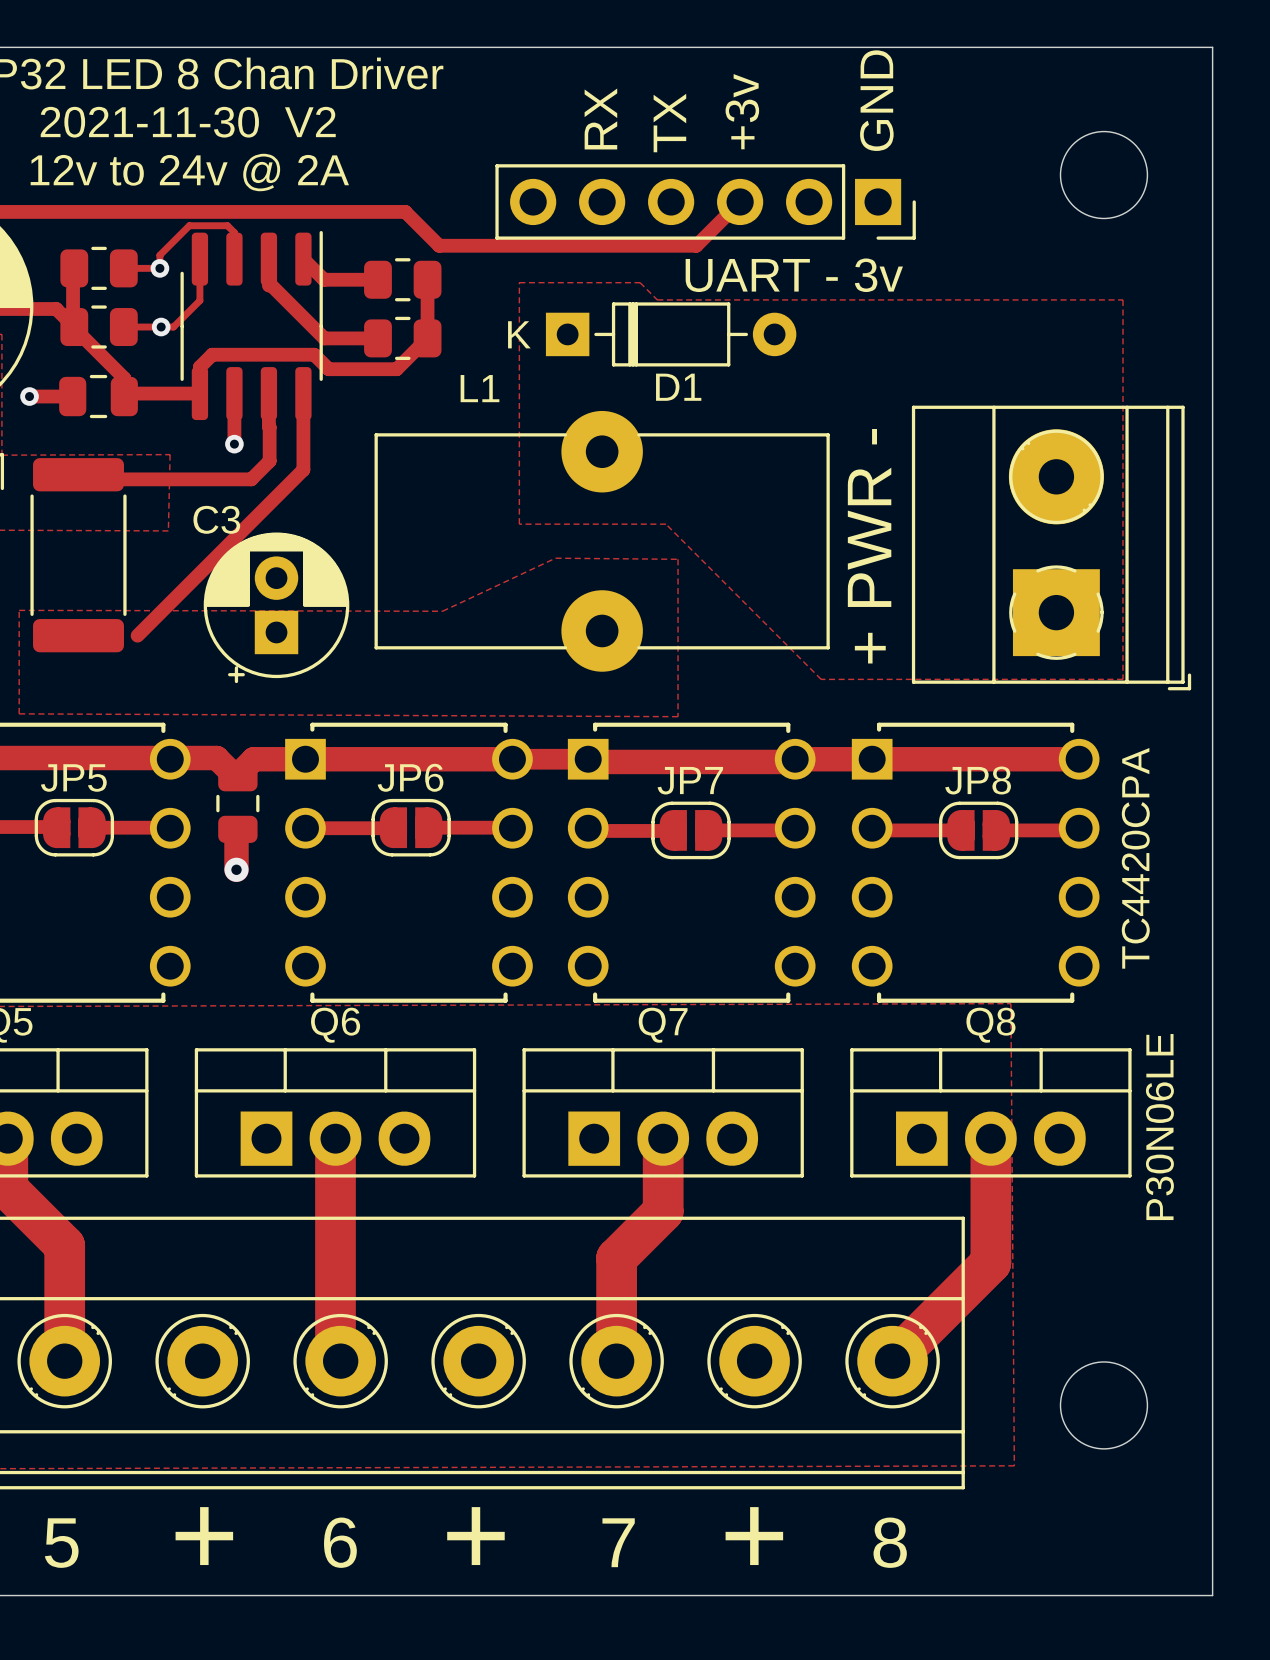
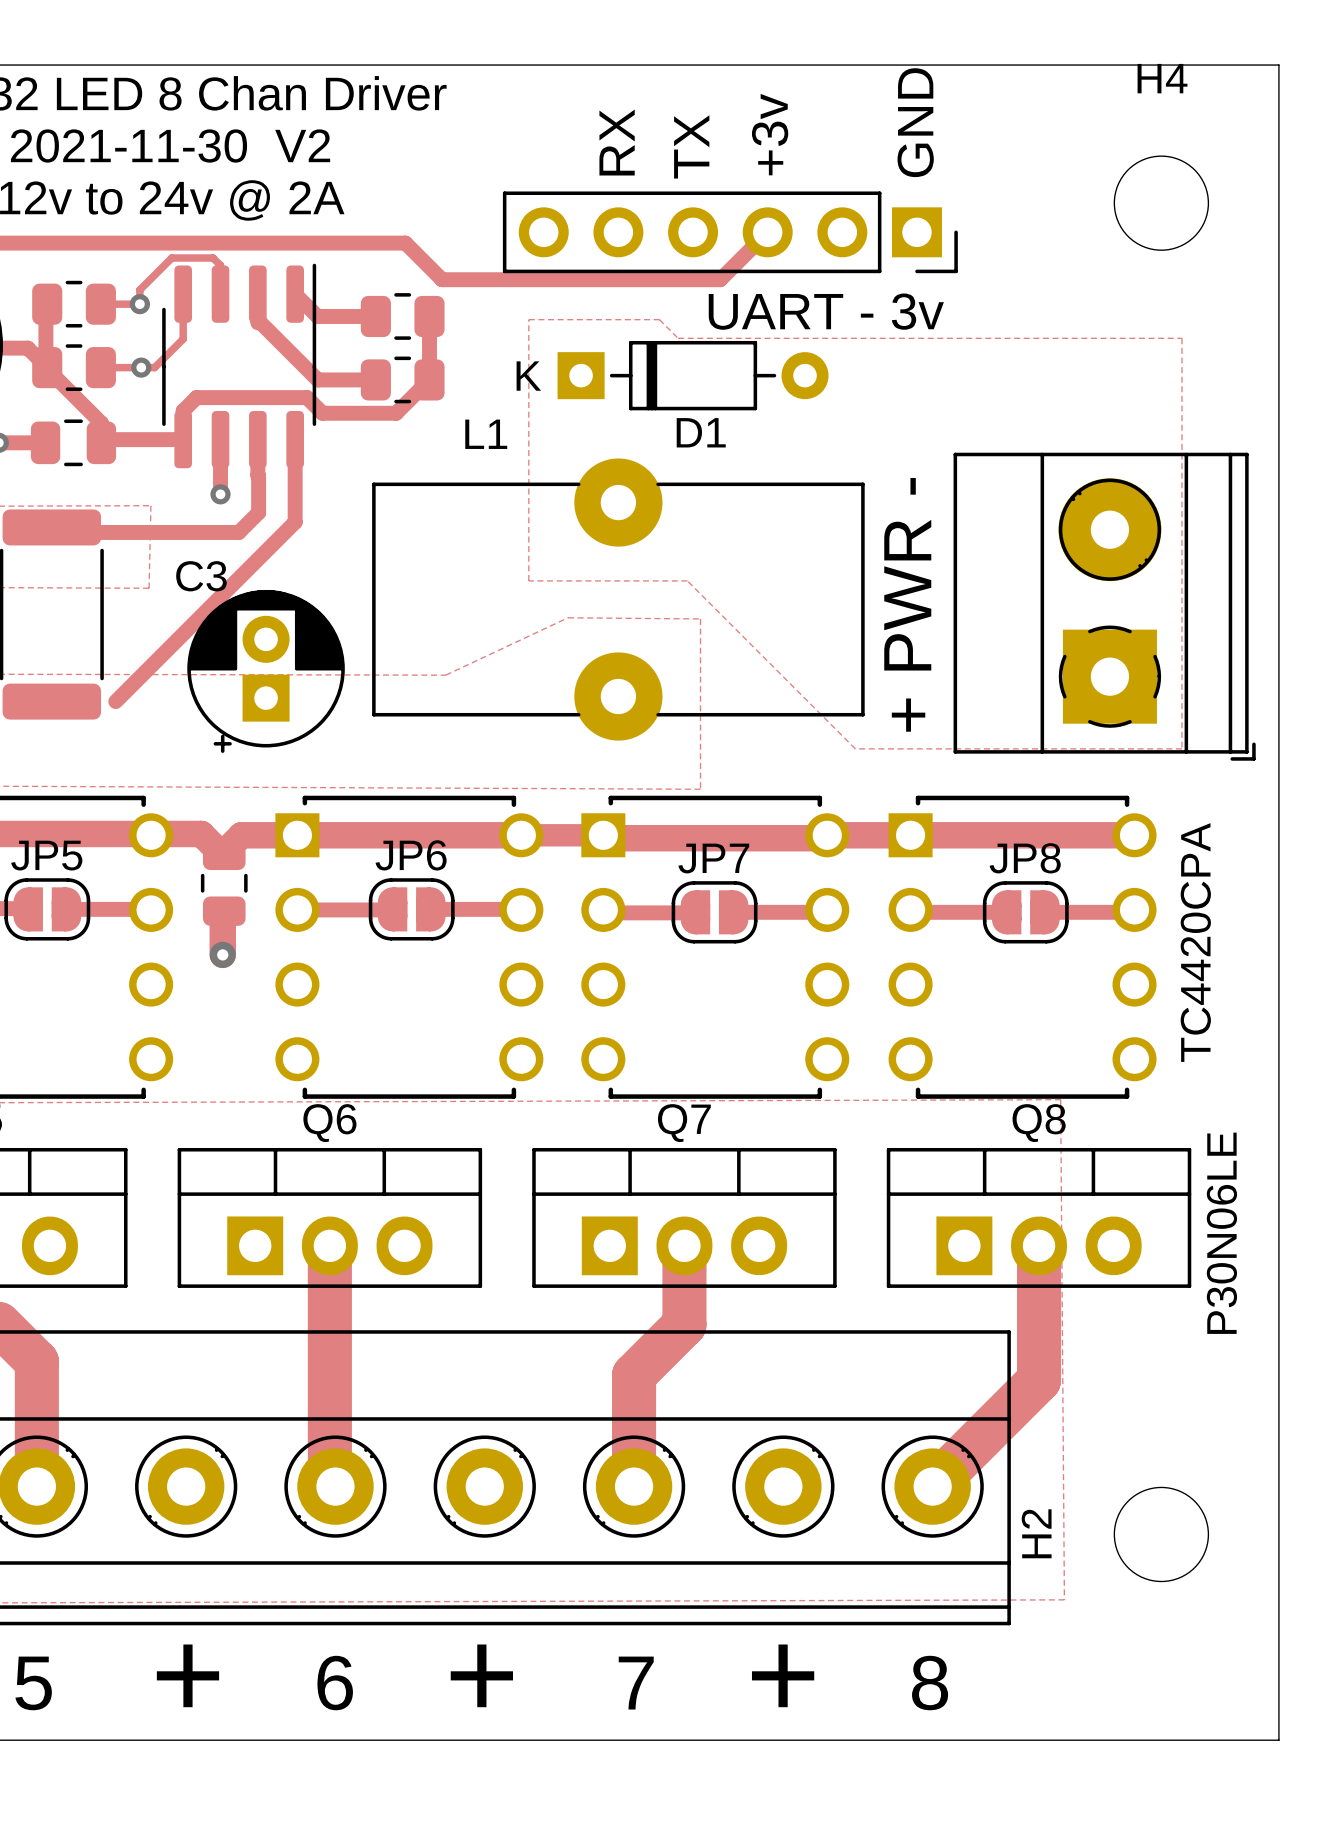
H4 name: none -> H4 (1162, 78)
H2 name: none -> H2 (1036, 1533)

